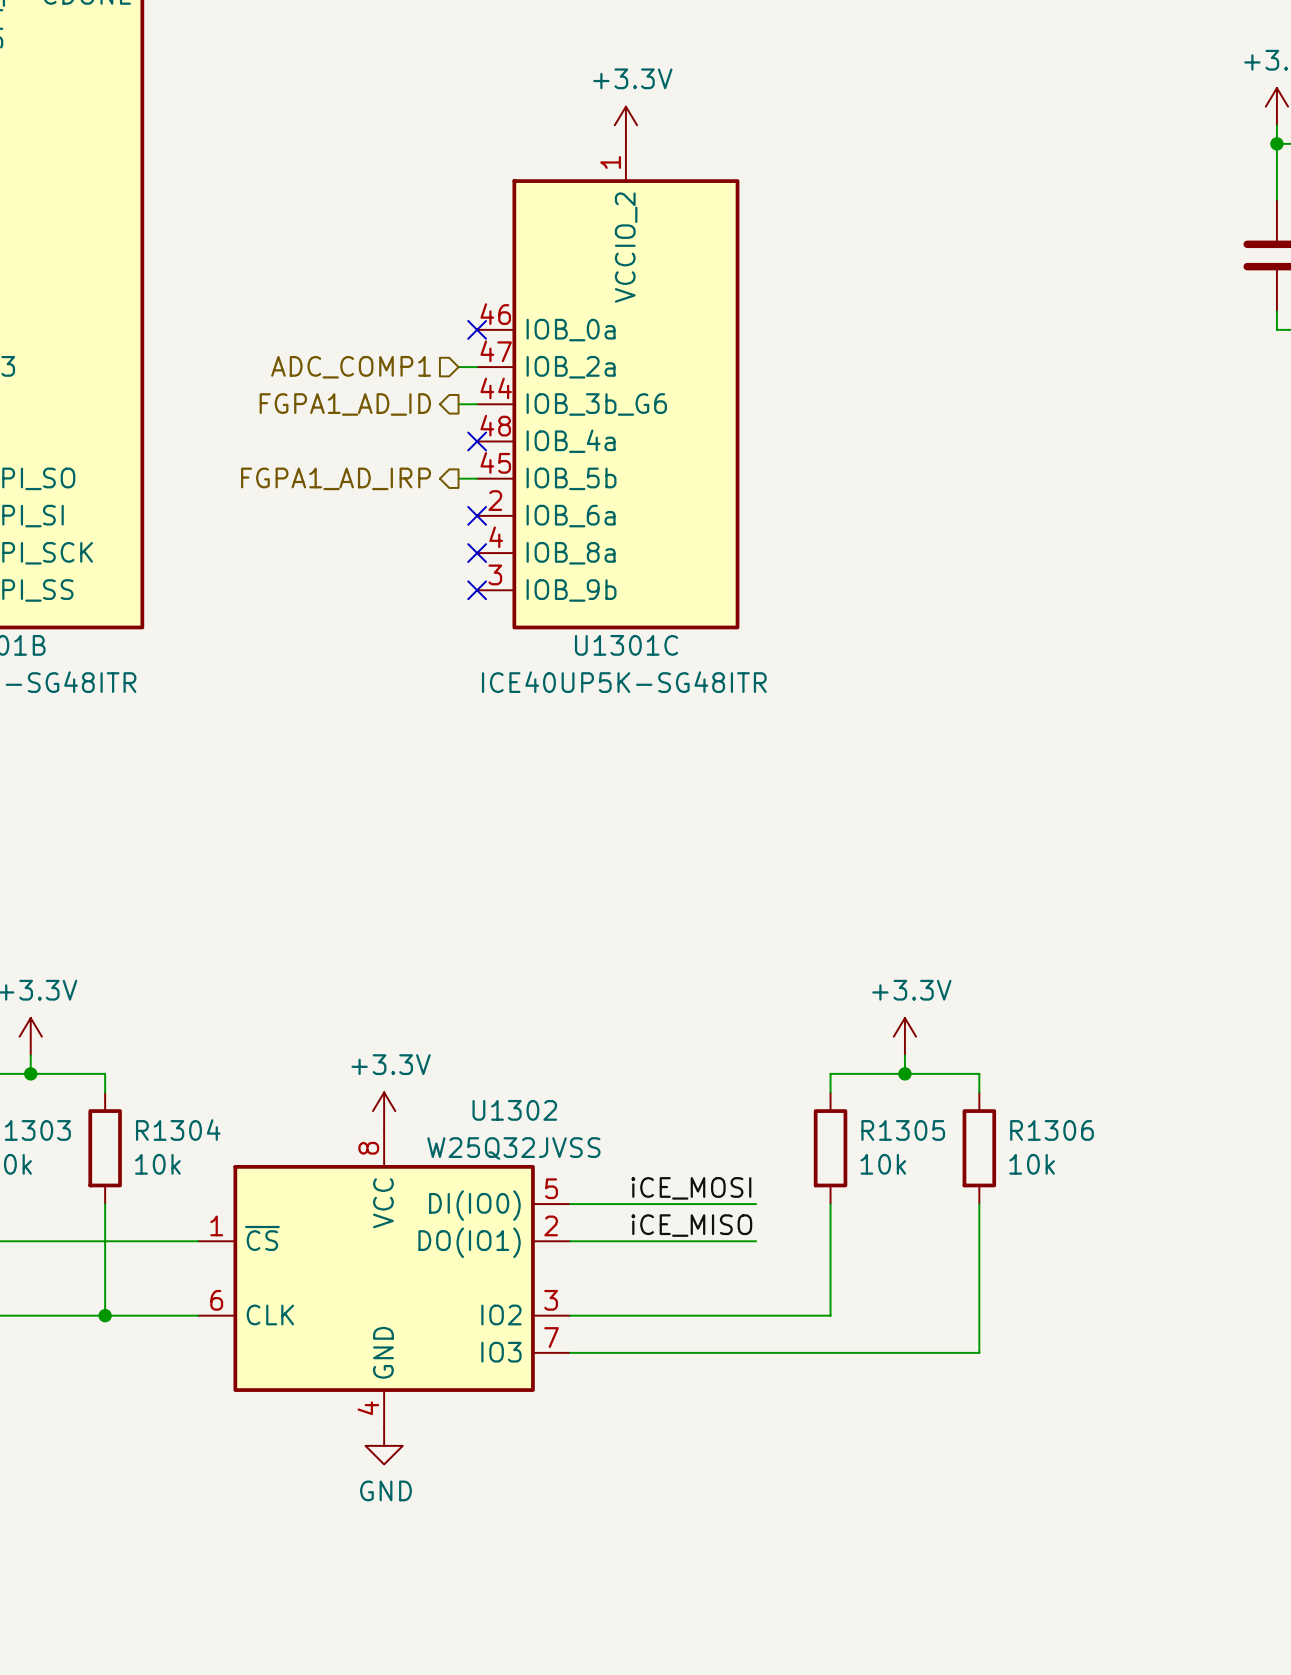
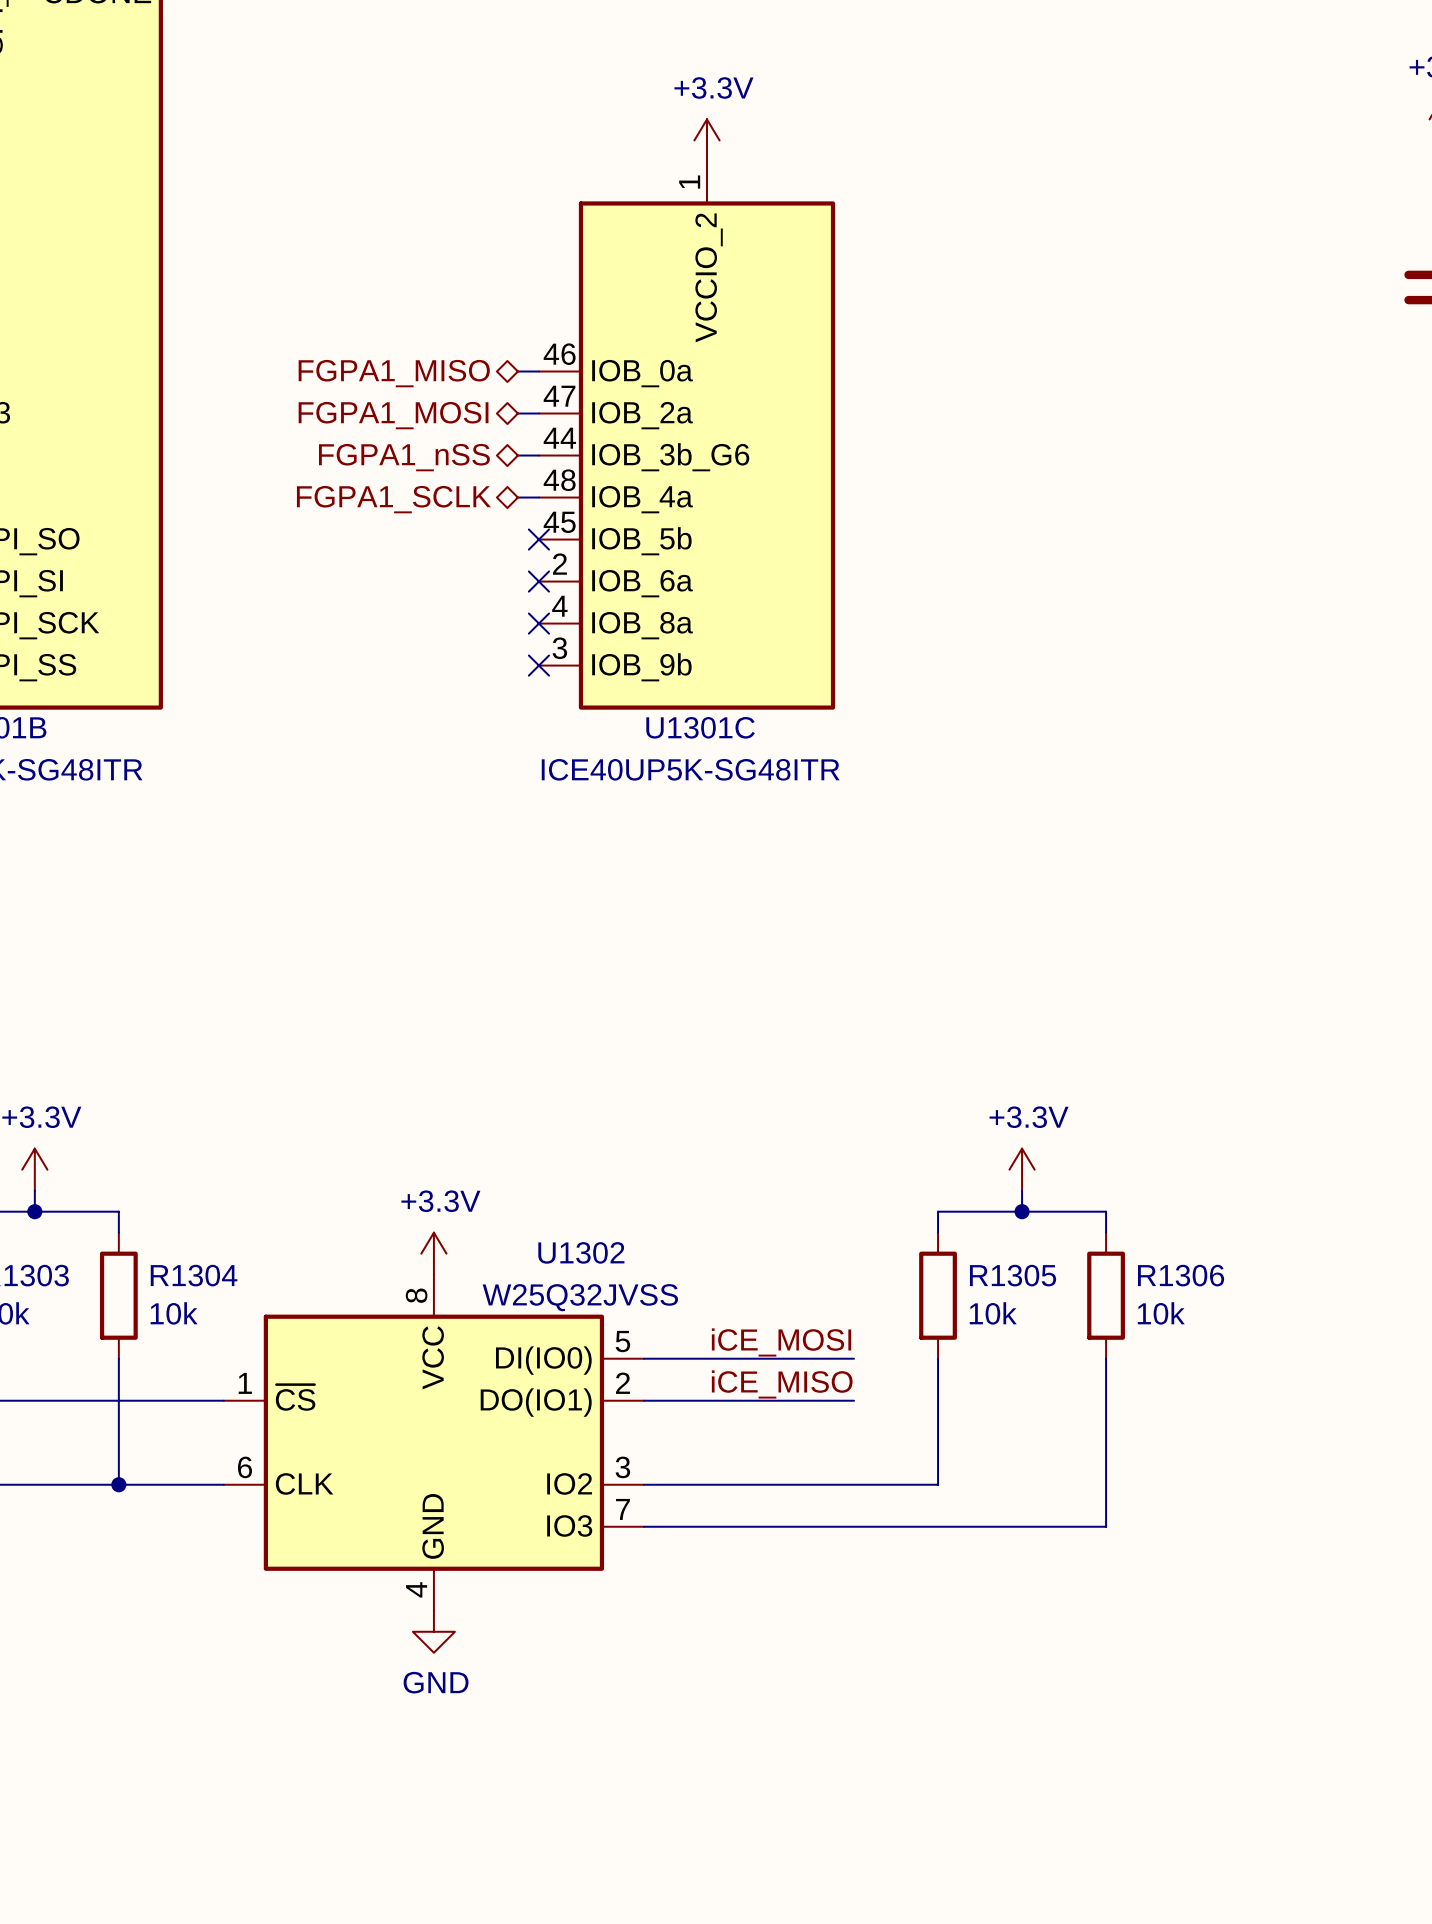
wire: none -> (517, 371) (538, 371)
no-connect mark: (477, 329) -> none
hierarchical label: none -> FGPA1_MISO (394, 373)
hierarchical label shape: input (351, 367) -> bidirectional (393, 415)
hierarchical label: ADC_COMP1 (351, 367) -> FGPA1_MOSI (393, 415)
hierarchical label shape: output (345, 404) -> bidirectional (404, 457)
hierarchical label: FGPA1_AD_ID (345, 404) -> FGPA1_nSS (404, 457)
hierarchical label: none -> FGPA1_SCLK (393, 499)
no-connect mark position: (477, 441) -> (538, 539)
hierarchical label: FGPA1_AD_IRP (336, 478) -> none
wire: (458, 478) (477, 478) -> (517, 497) (538, 497)

